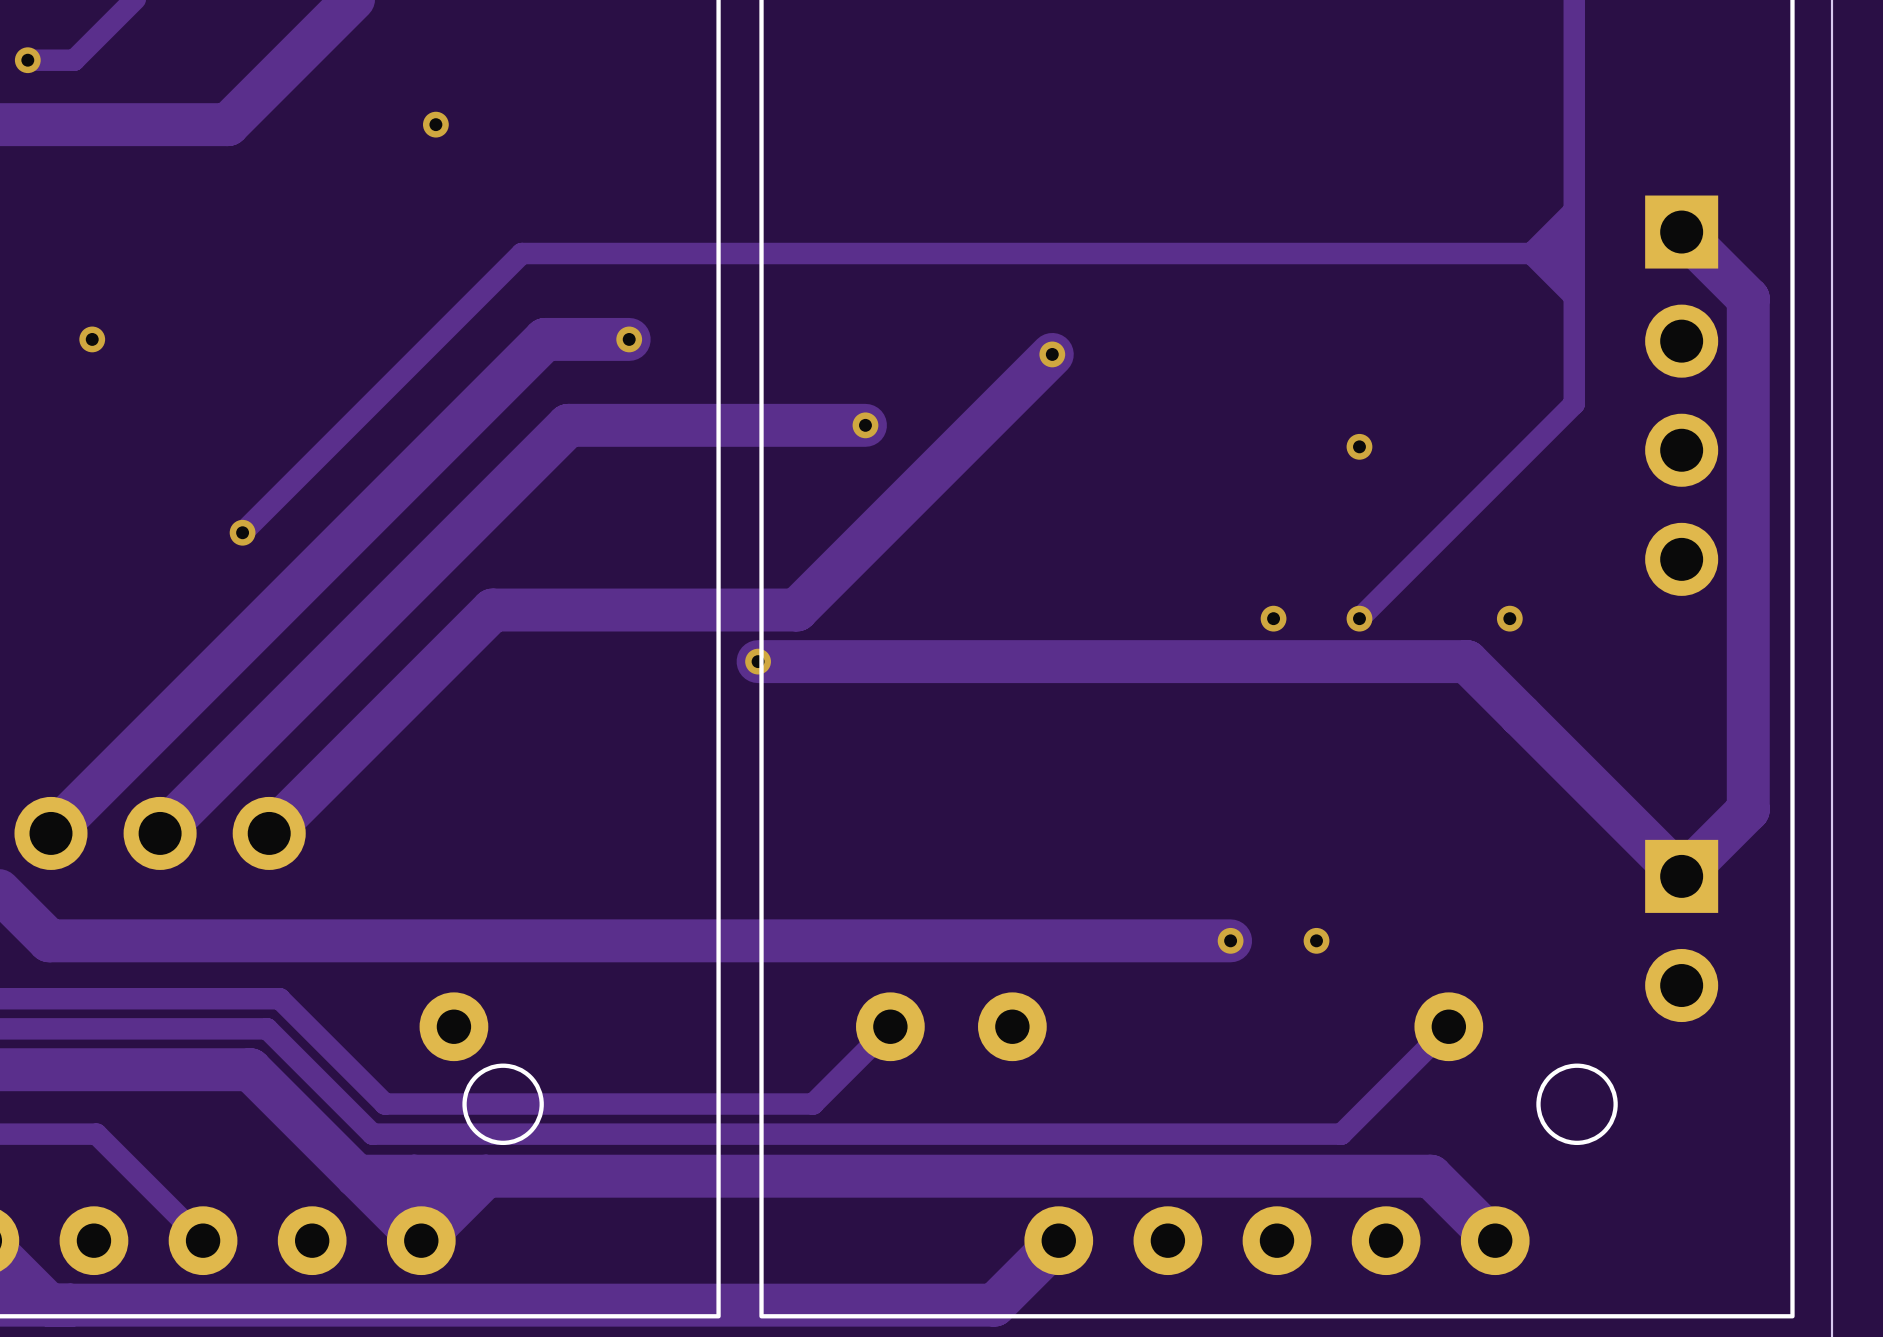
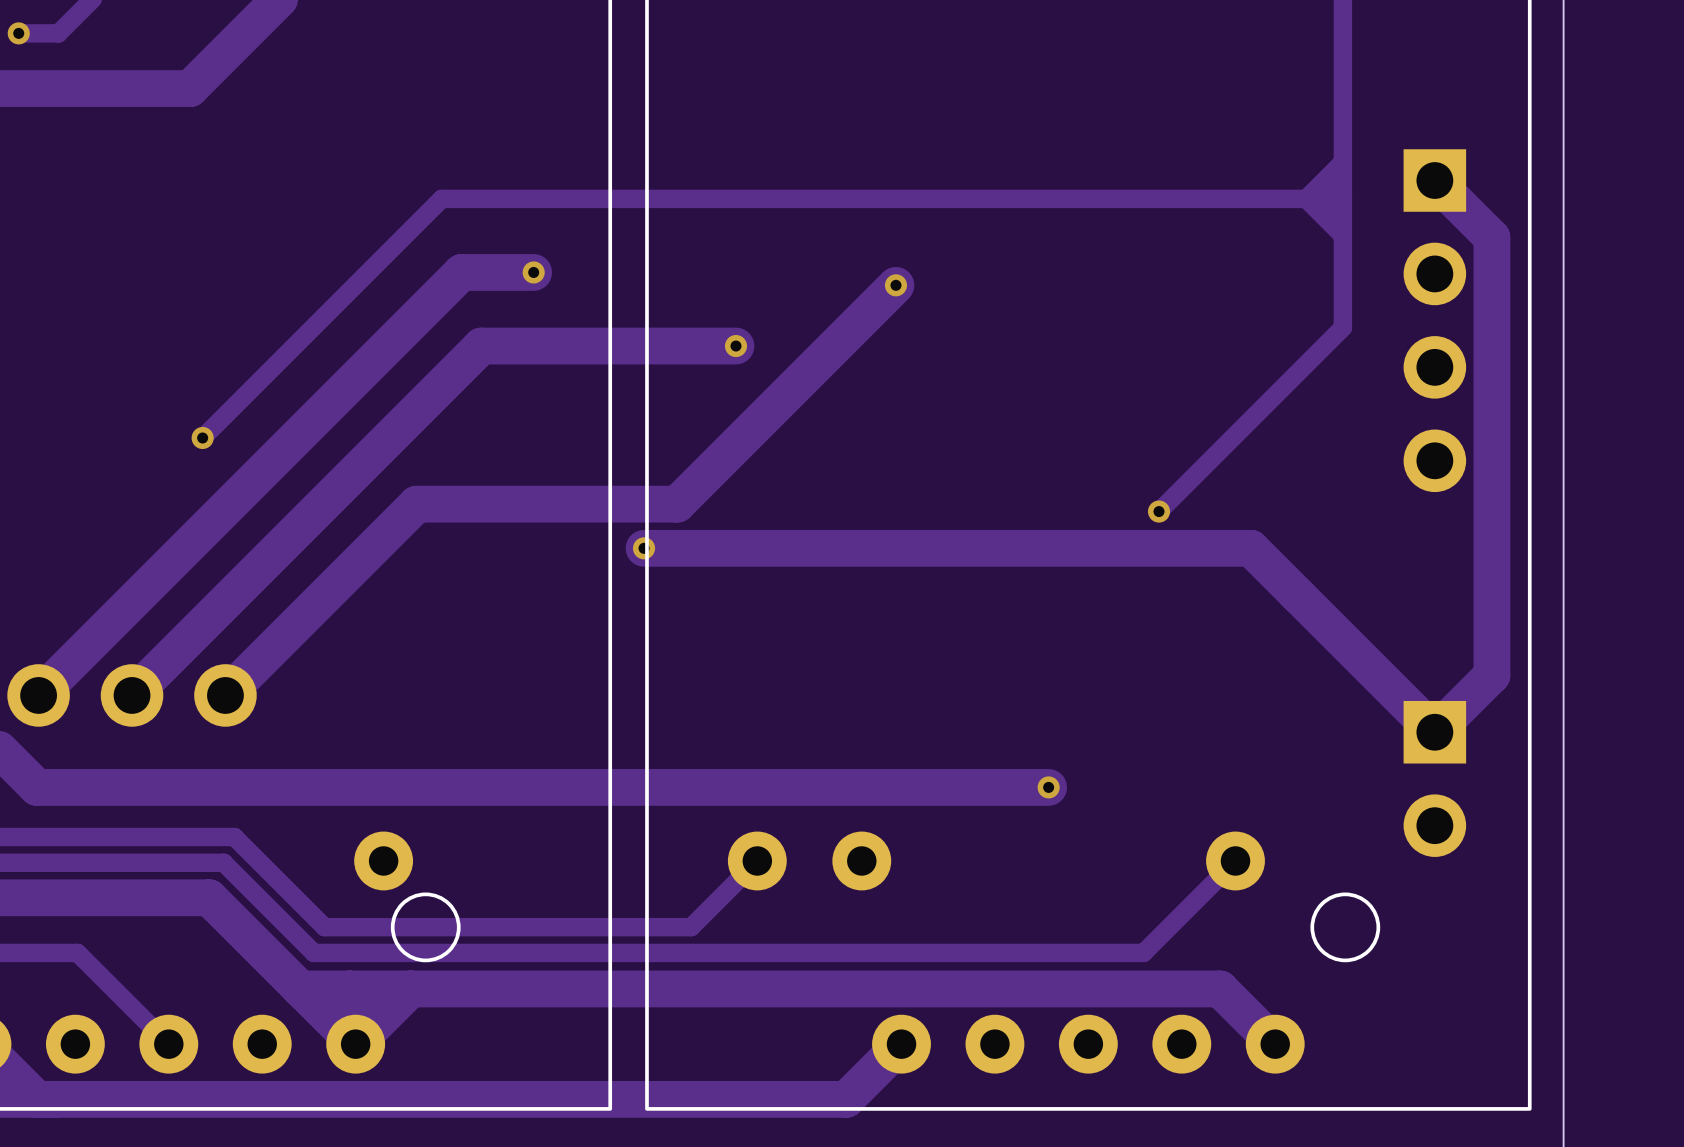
via: (435, 124) -> none
via: (92, 339) -> none
via: (1359, 446) -> none
via: (1273, 618) -> none
via: (1509, 618) -> none
via: (1316, 940) -> none

